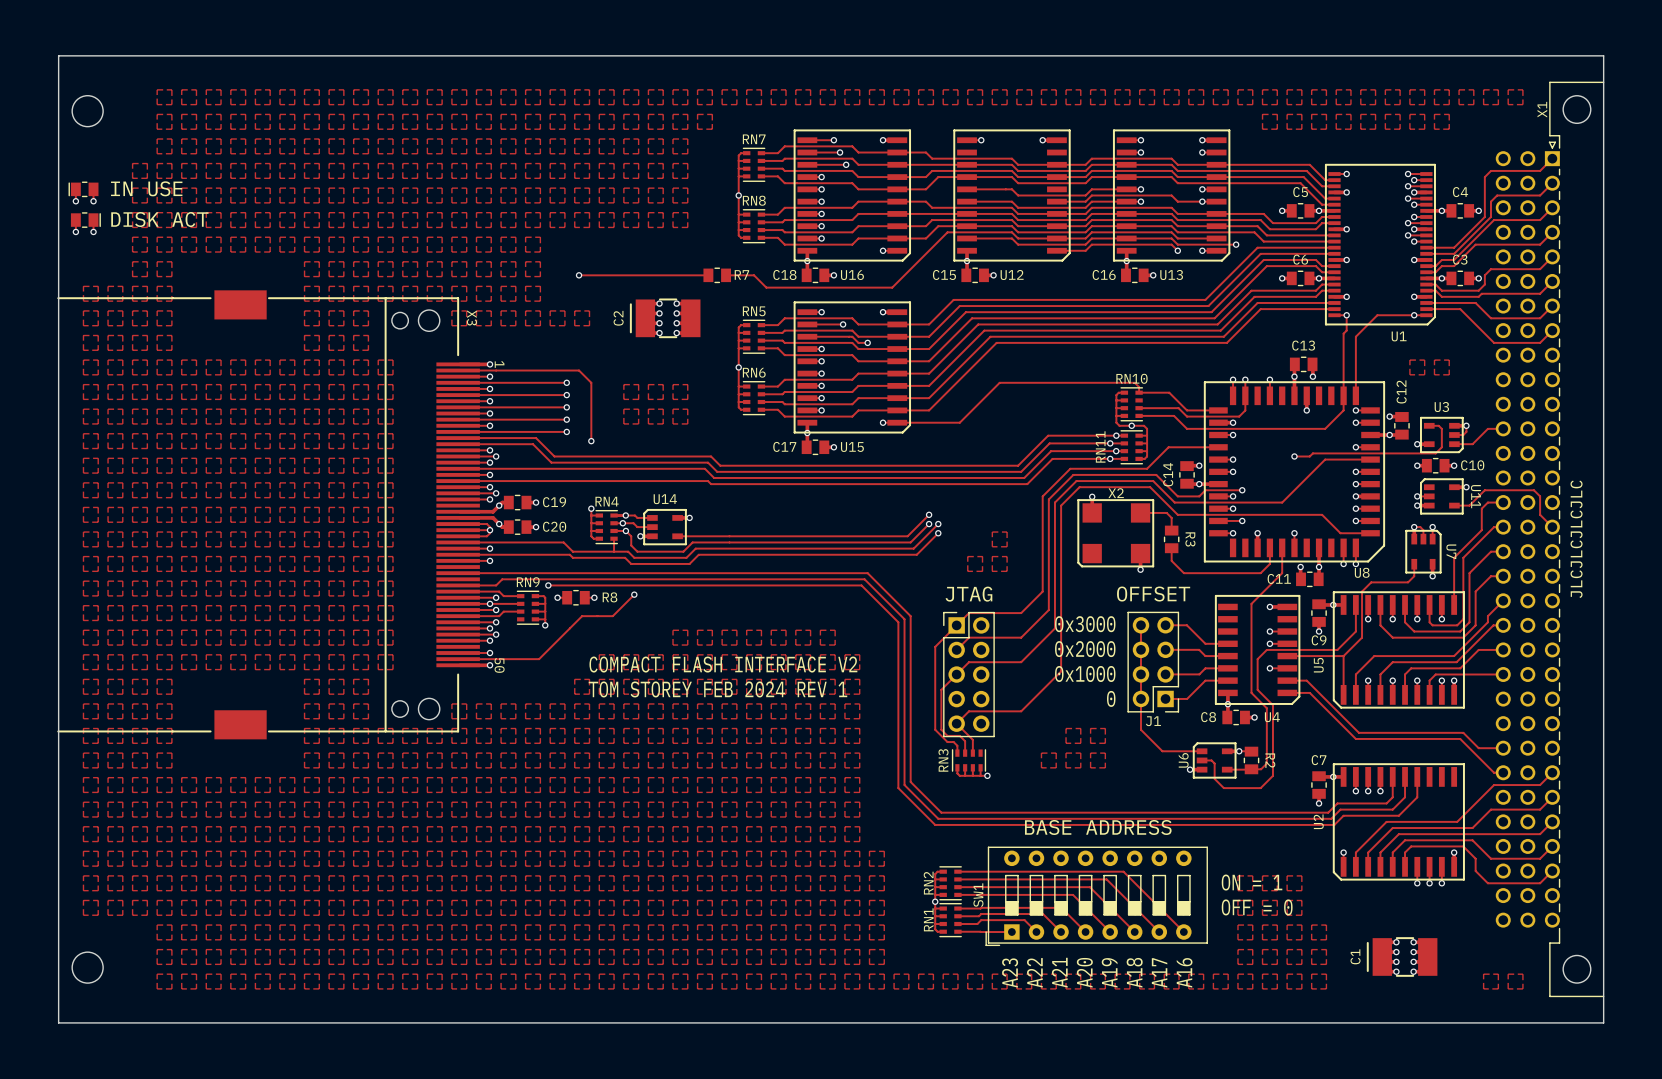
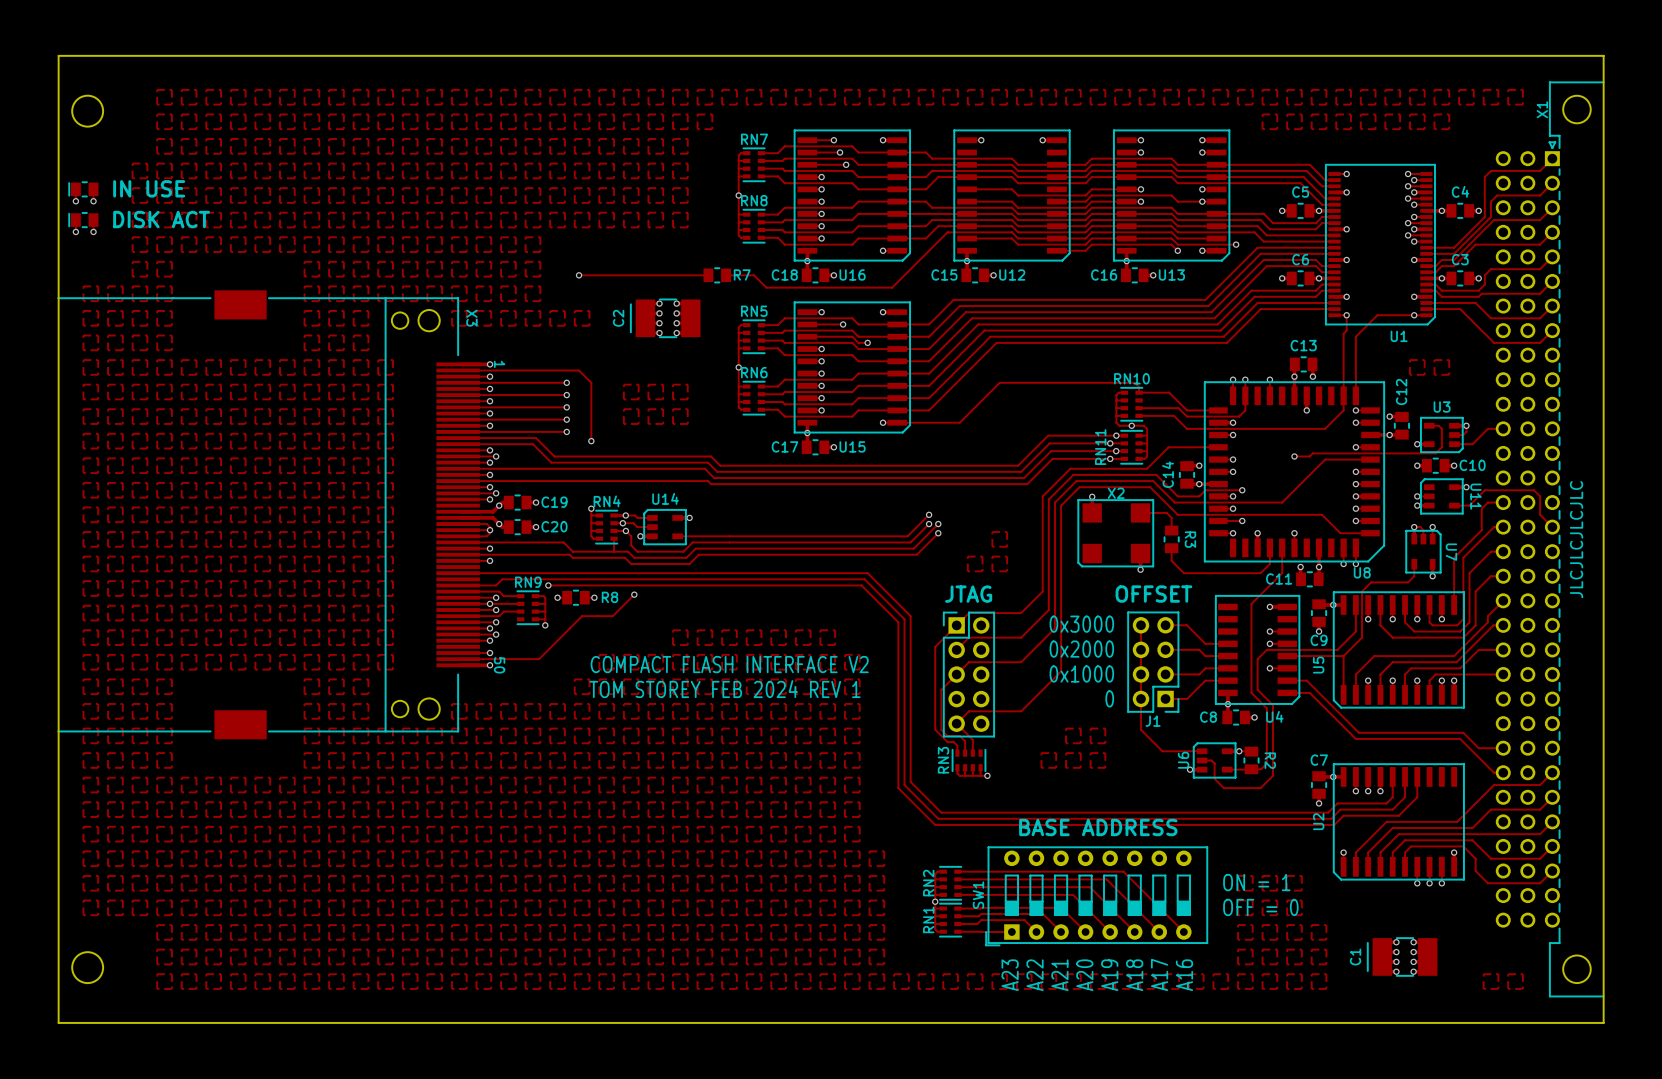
part rotation: 0° (85, 220) -> 180° (83, 220)

